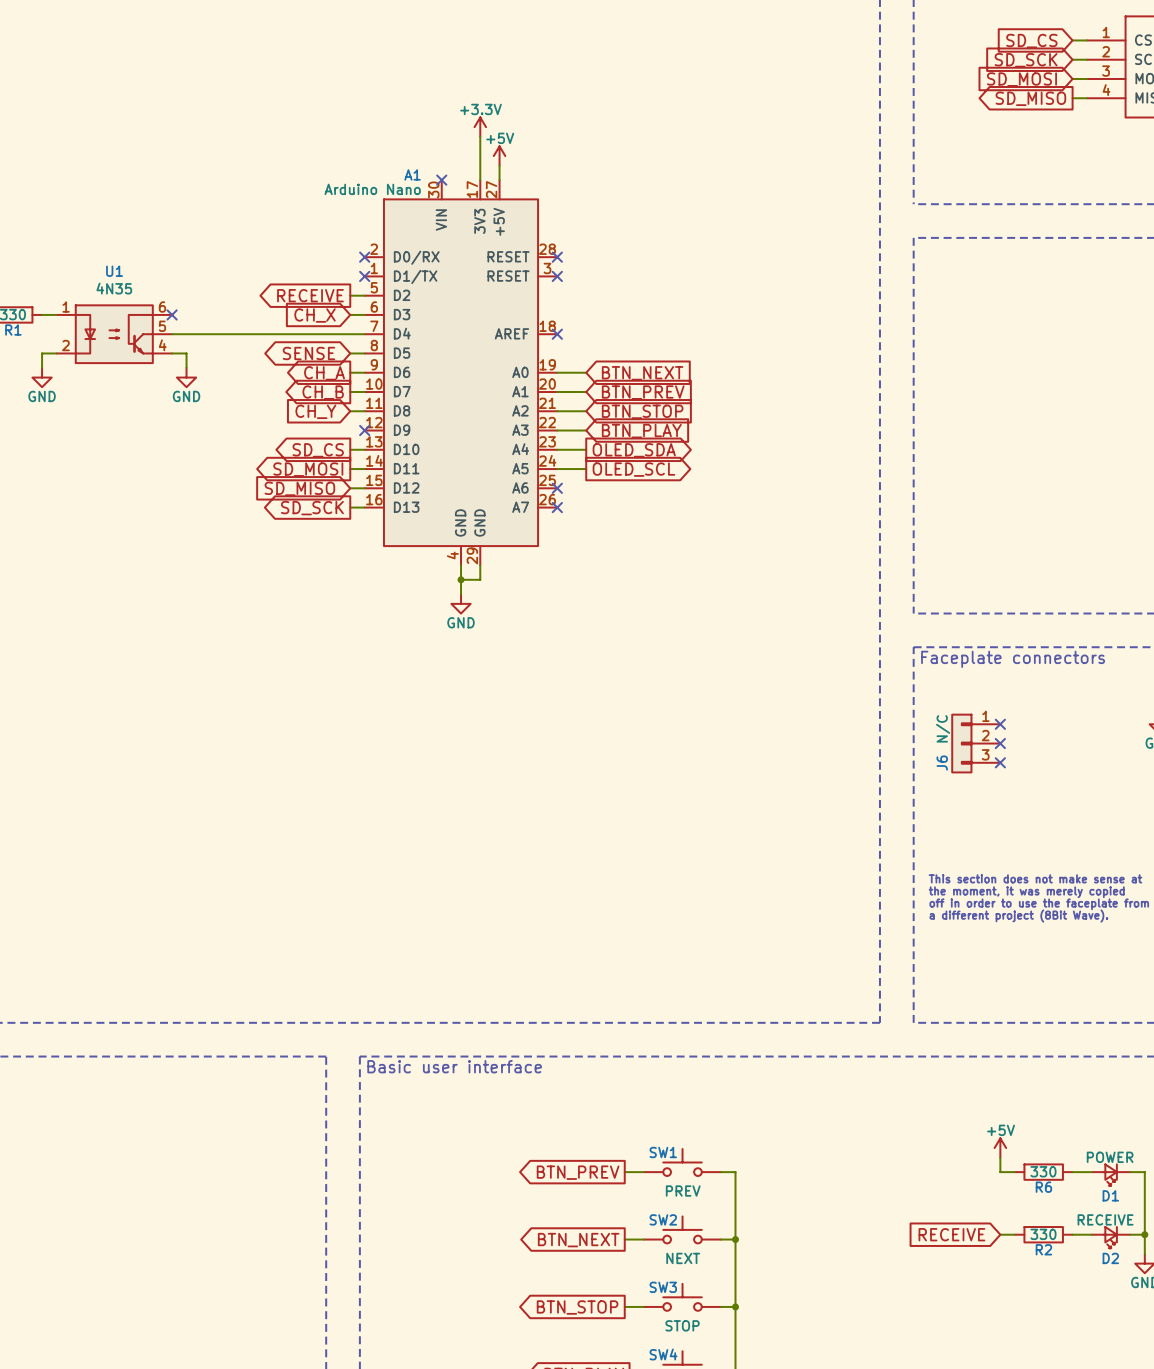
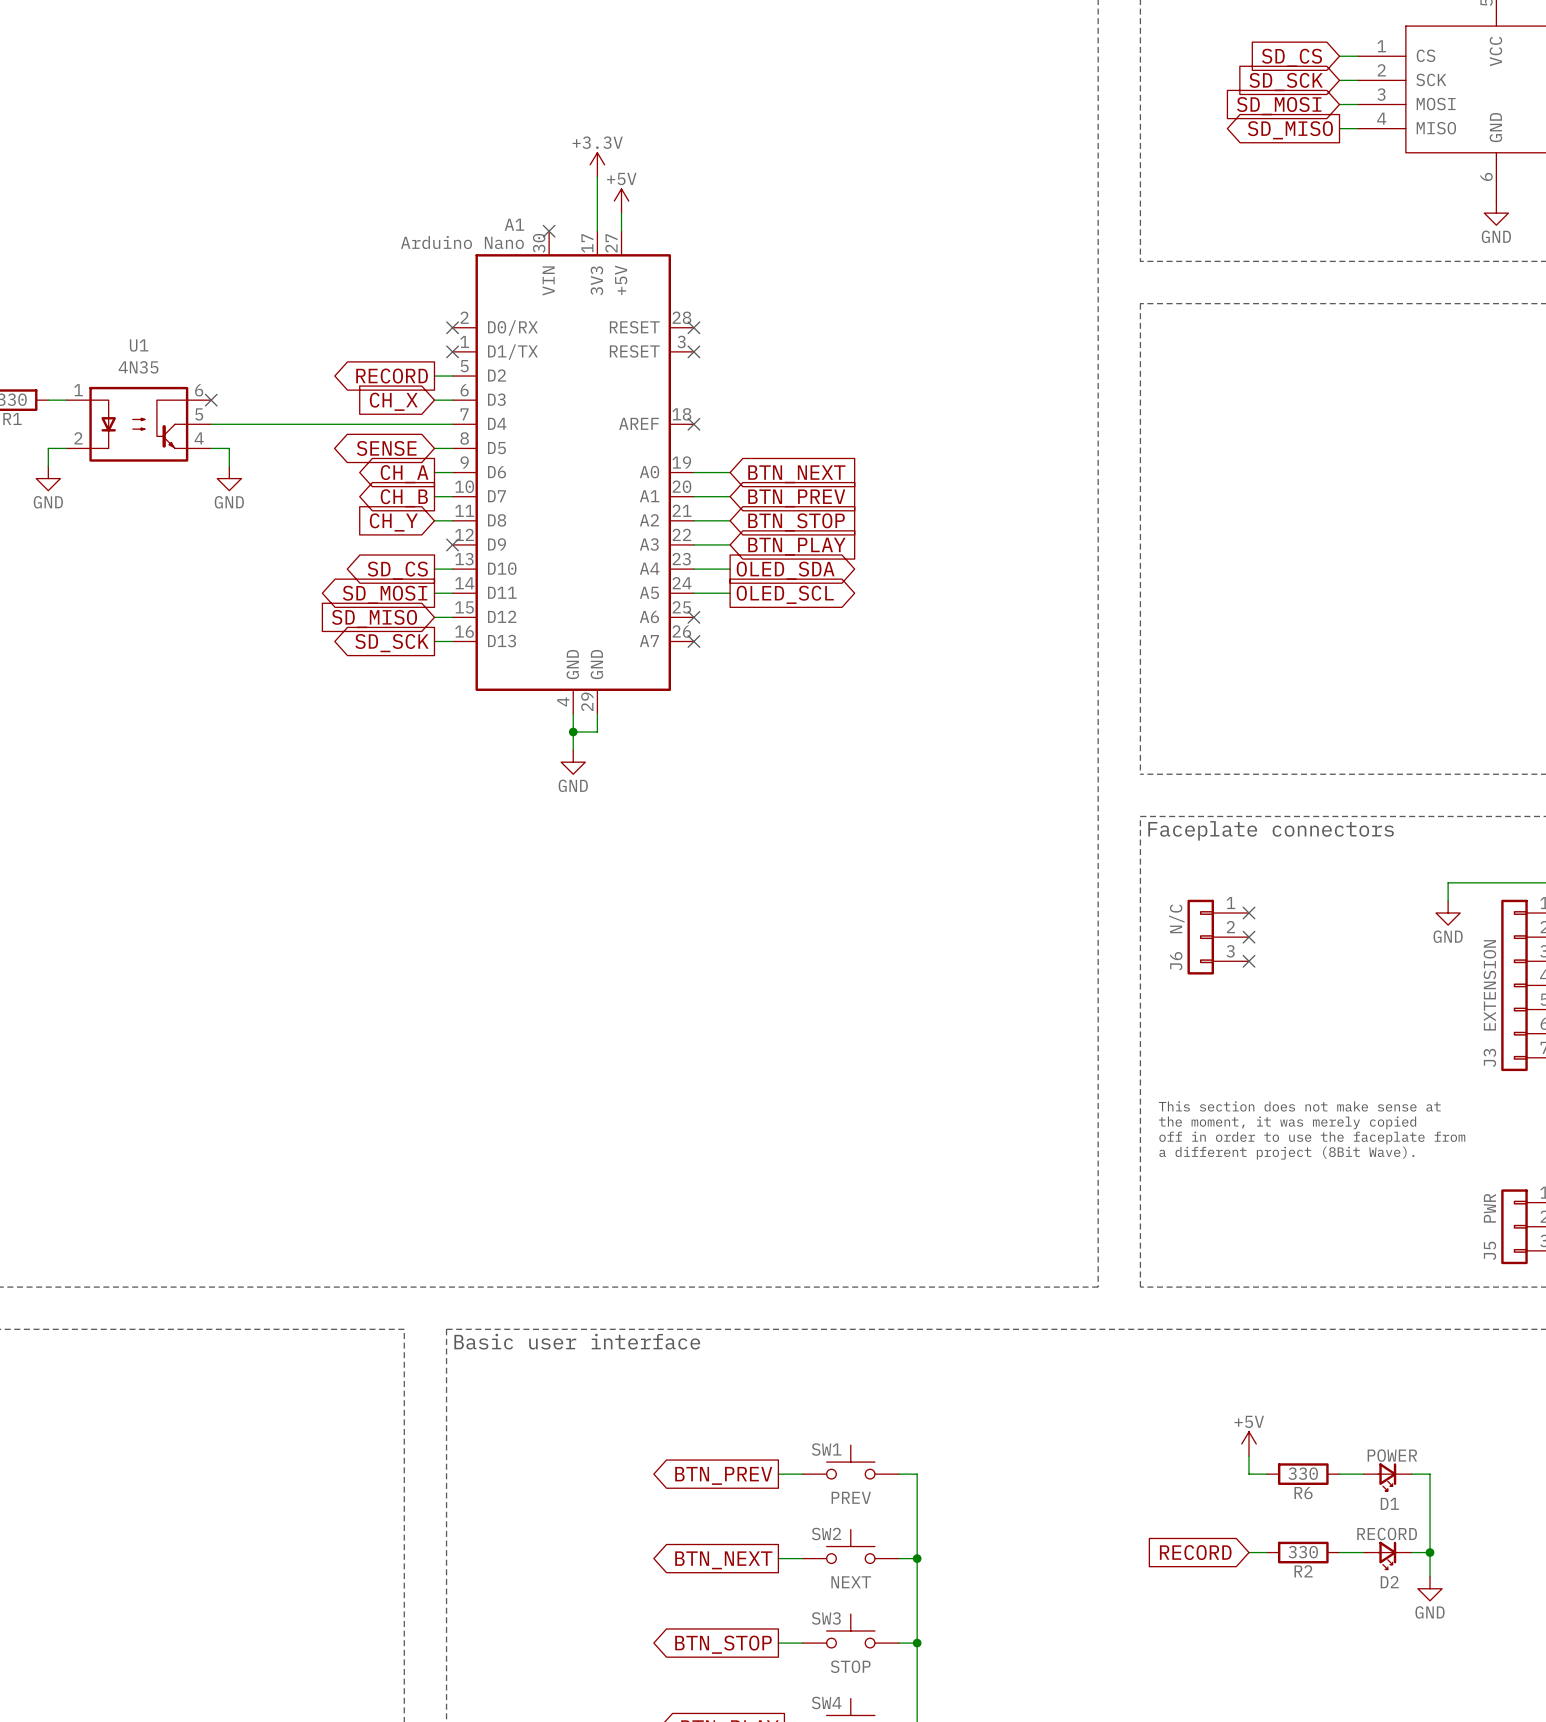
global label: RECEIVE (310, 295) -> RECORD (392, 376)
D2 value: RECEIVE (1105, 1219) -> RECORD (1387, 1534)
global label: RECEIVE (951, 1234) -> RECORD (1195, 1552)

